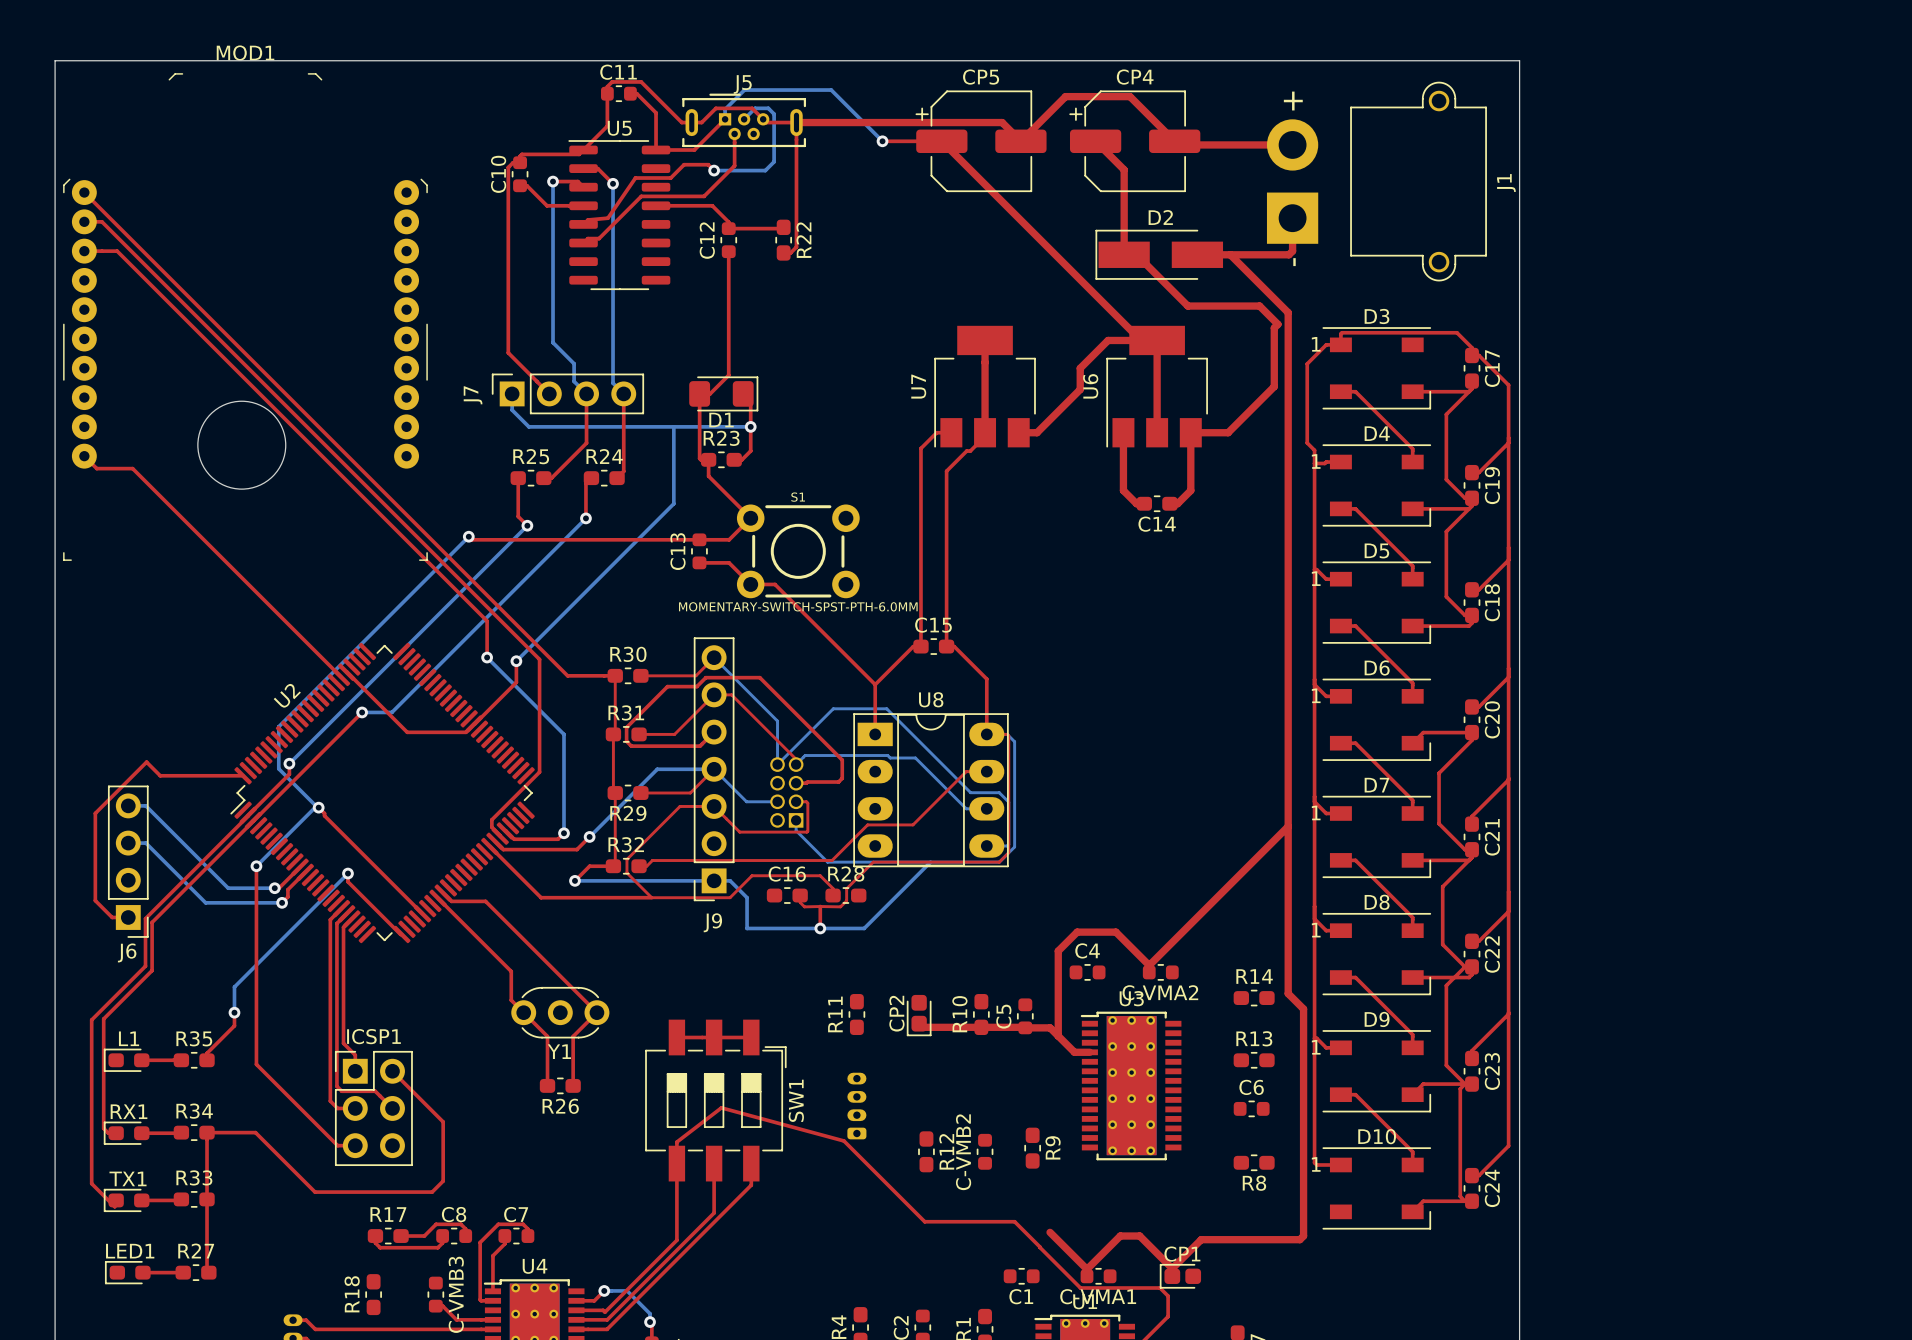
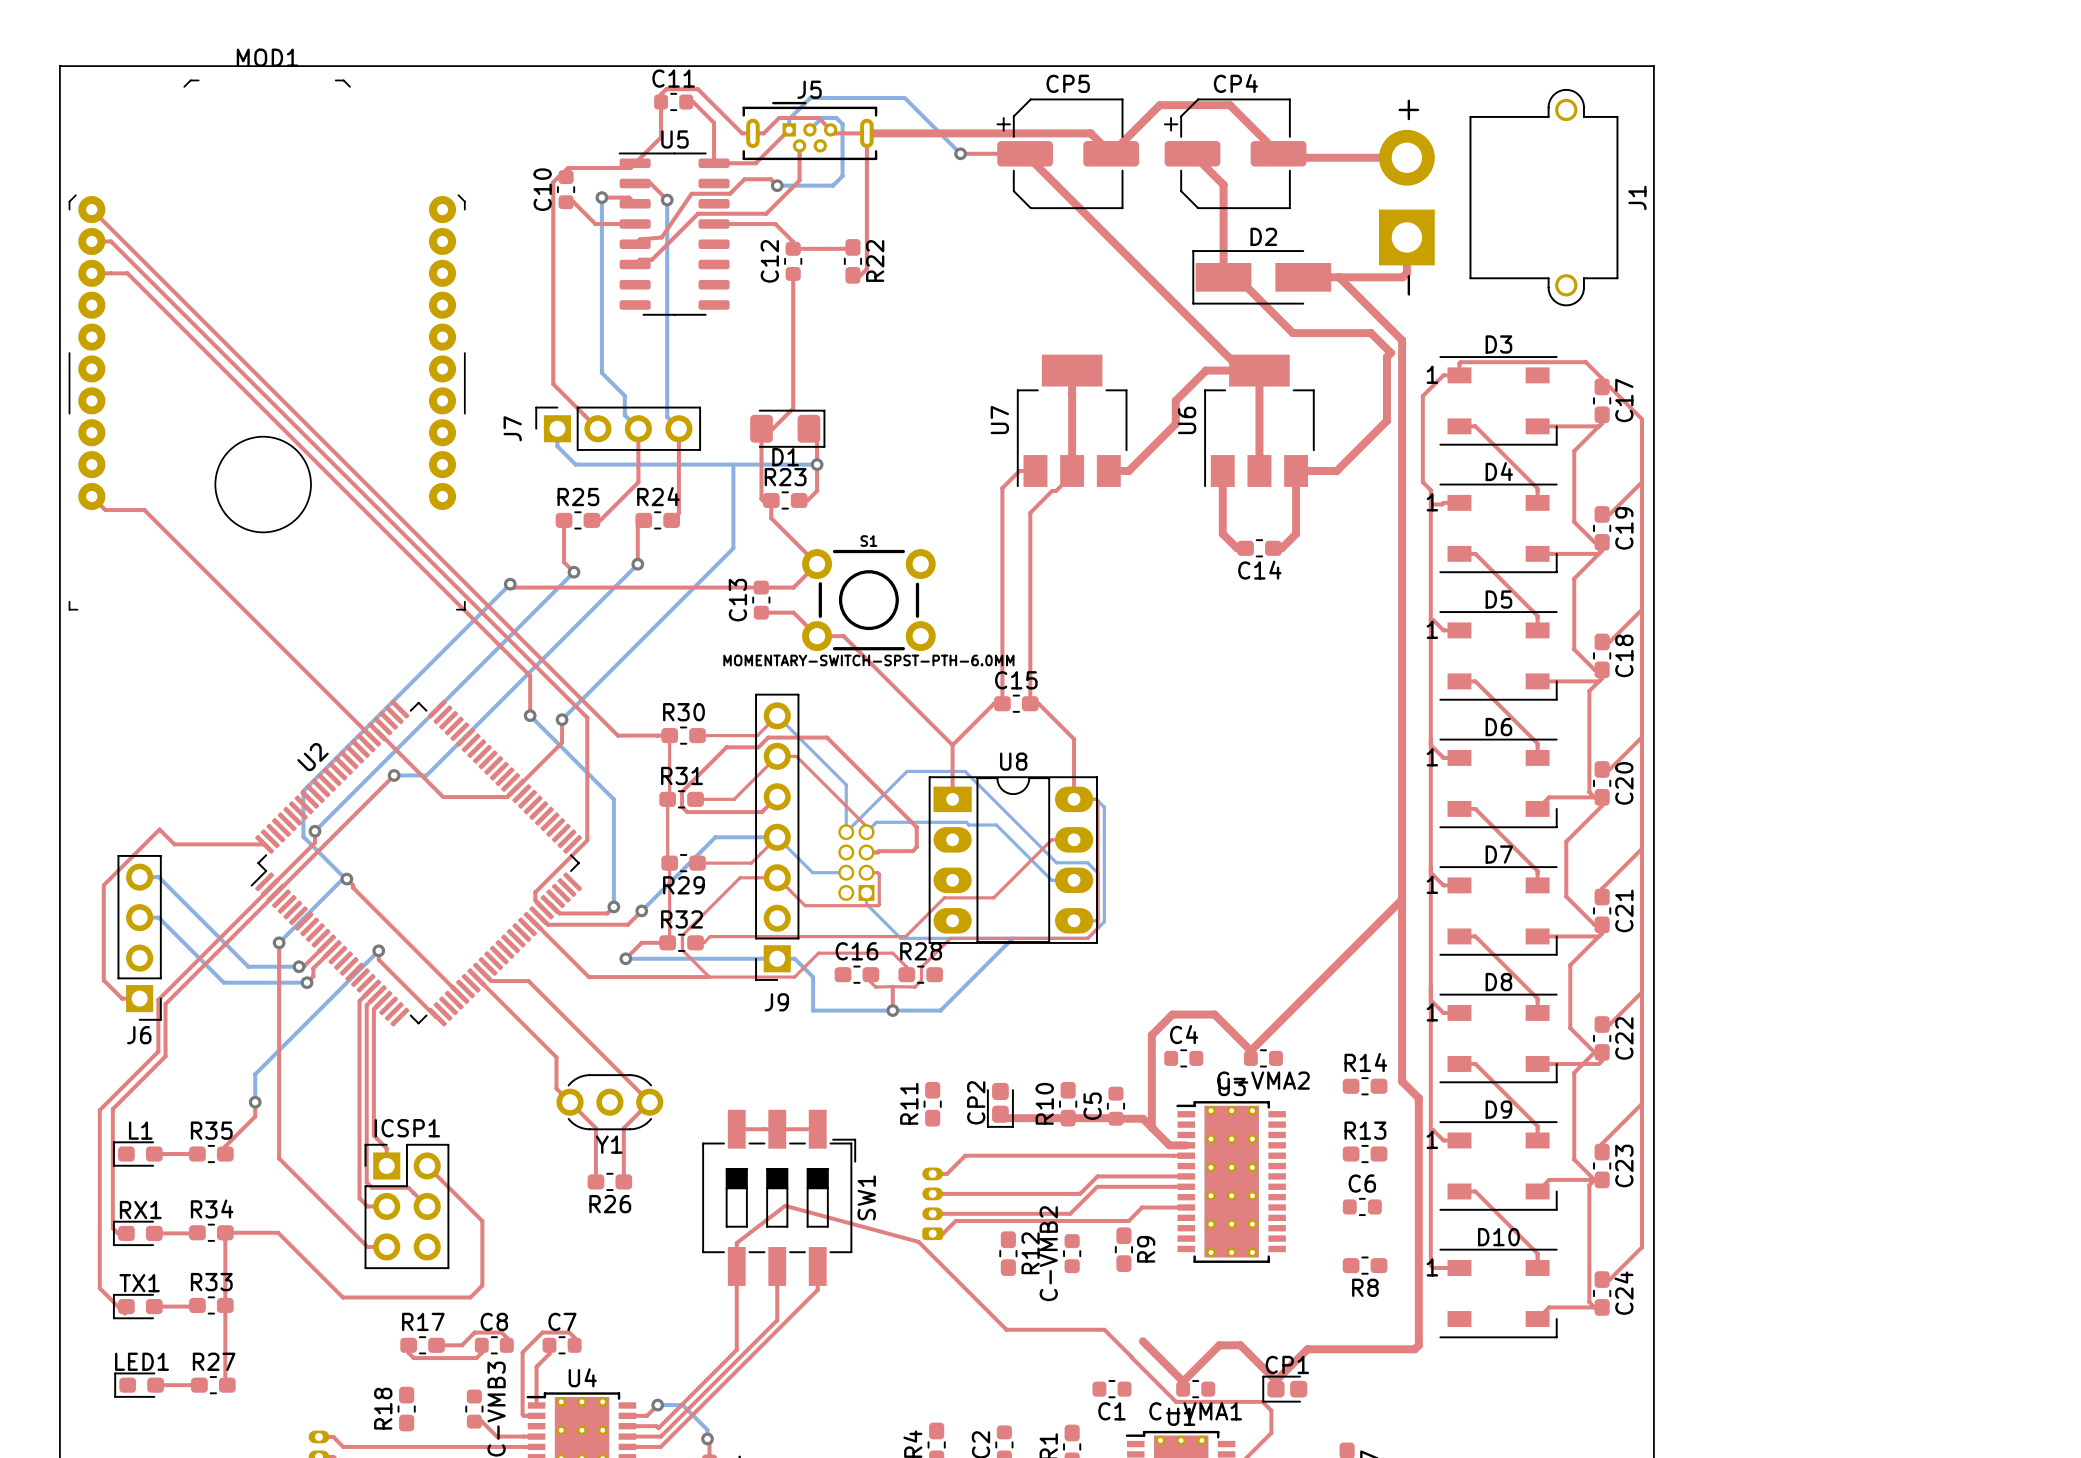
top track: none -> (1598, 681) (1589, 690) (1589, 792) (1594, 797)
top track: none -> (1186, 1155) (965, 1155) (947, 1173) (932, 1173)
top track: none -> (1186, 1176) (1097, 1176) (1080, 1193) (932, 1193)
top track: none -> (1186, 1186) (1097, 1186) (1070, 1213) (932, 1213)
top track: none -> (1186, 1207) (1142, 1207) (1128, 1220) (955, 1220) (943, 1233) (932, 1233)

